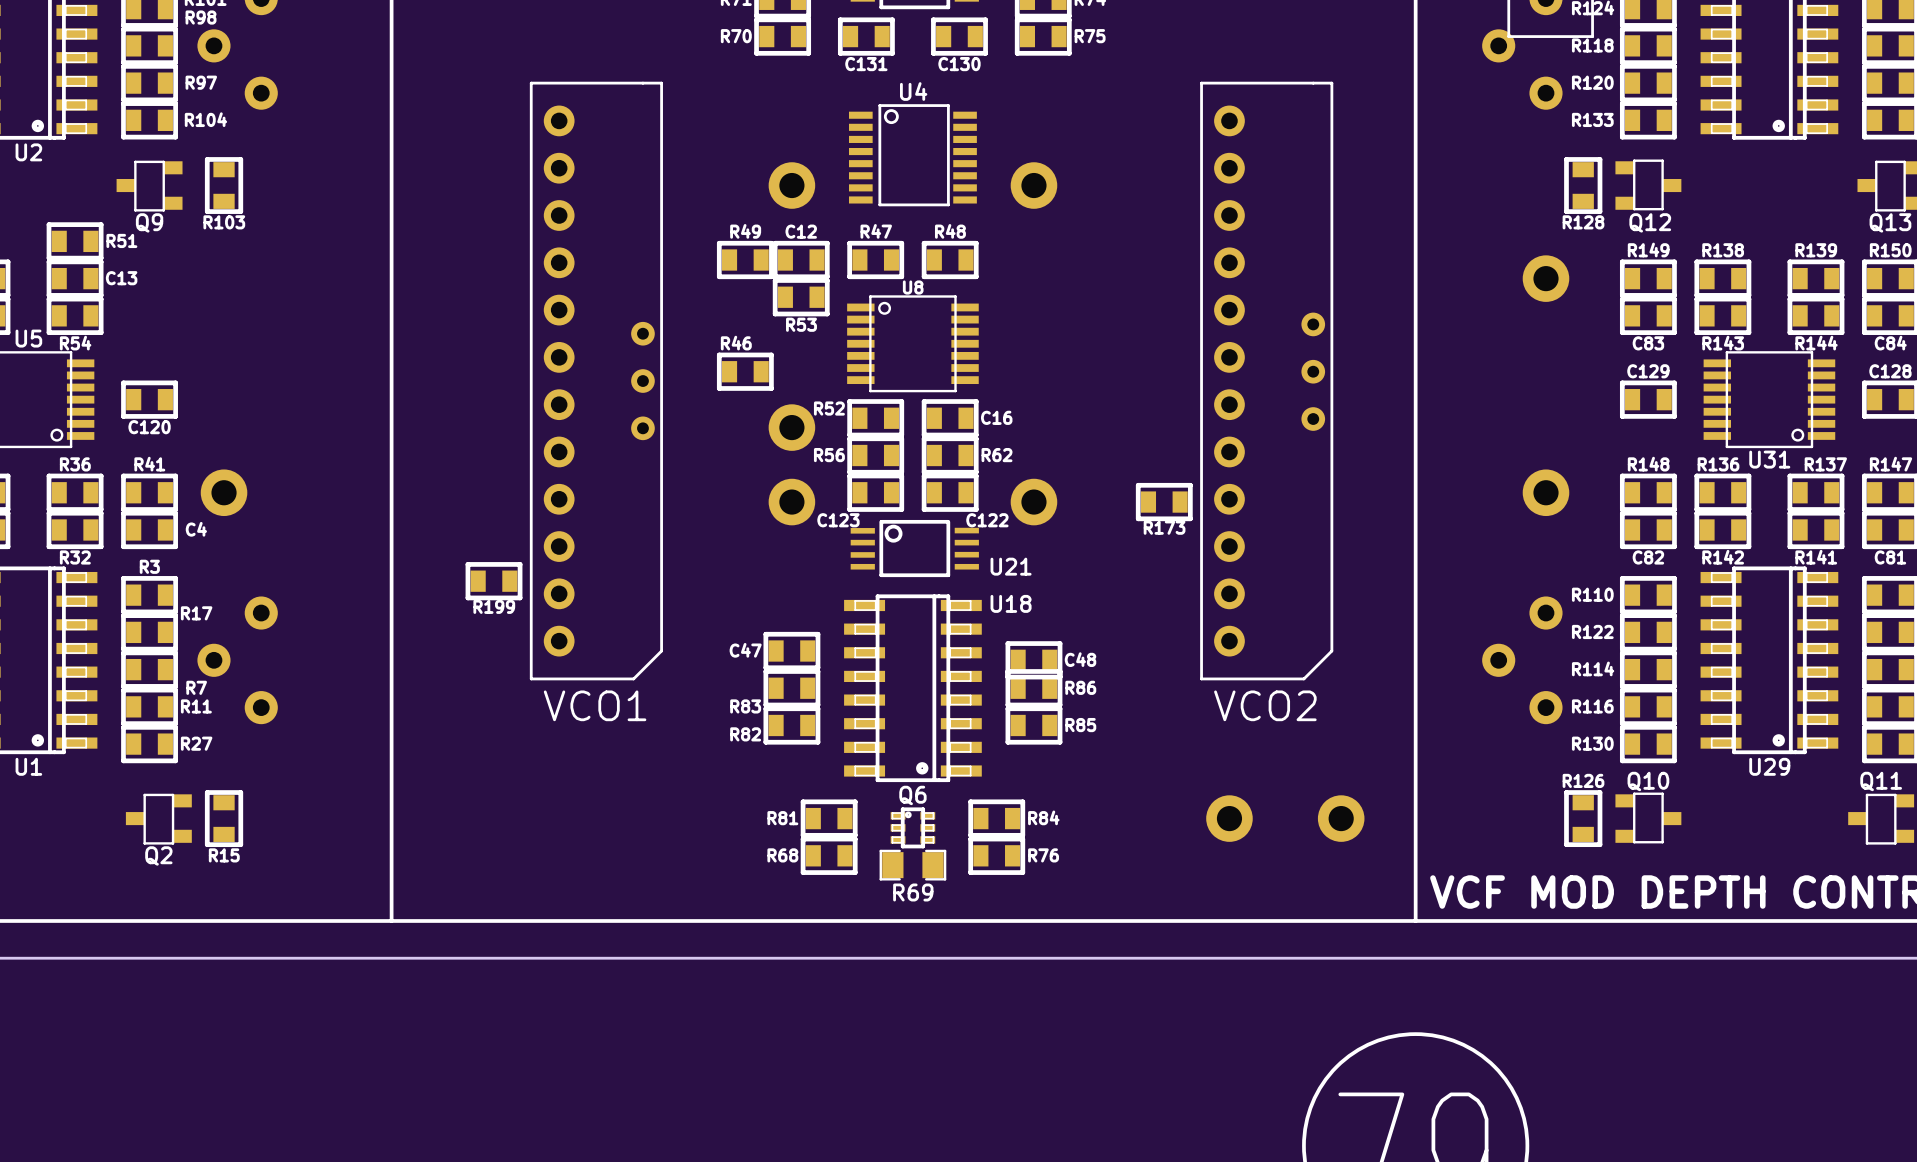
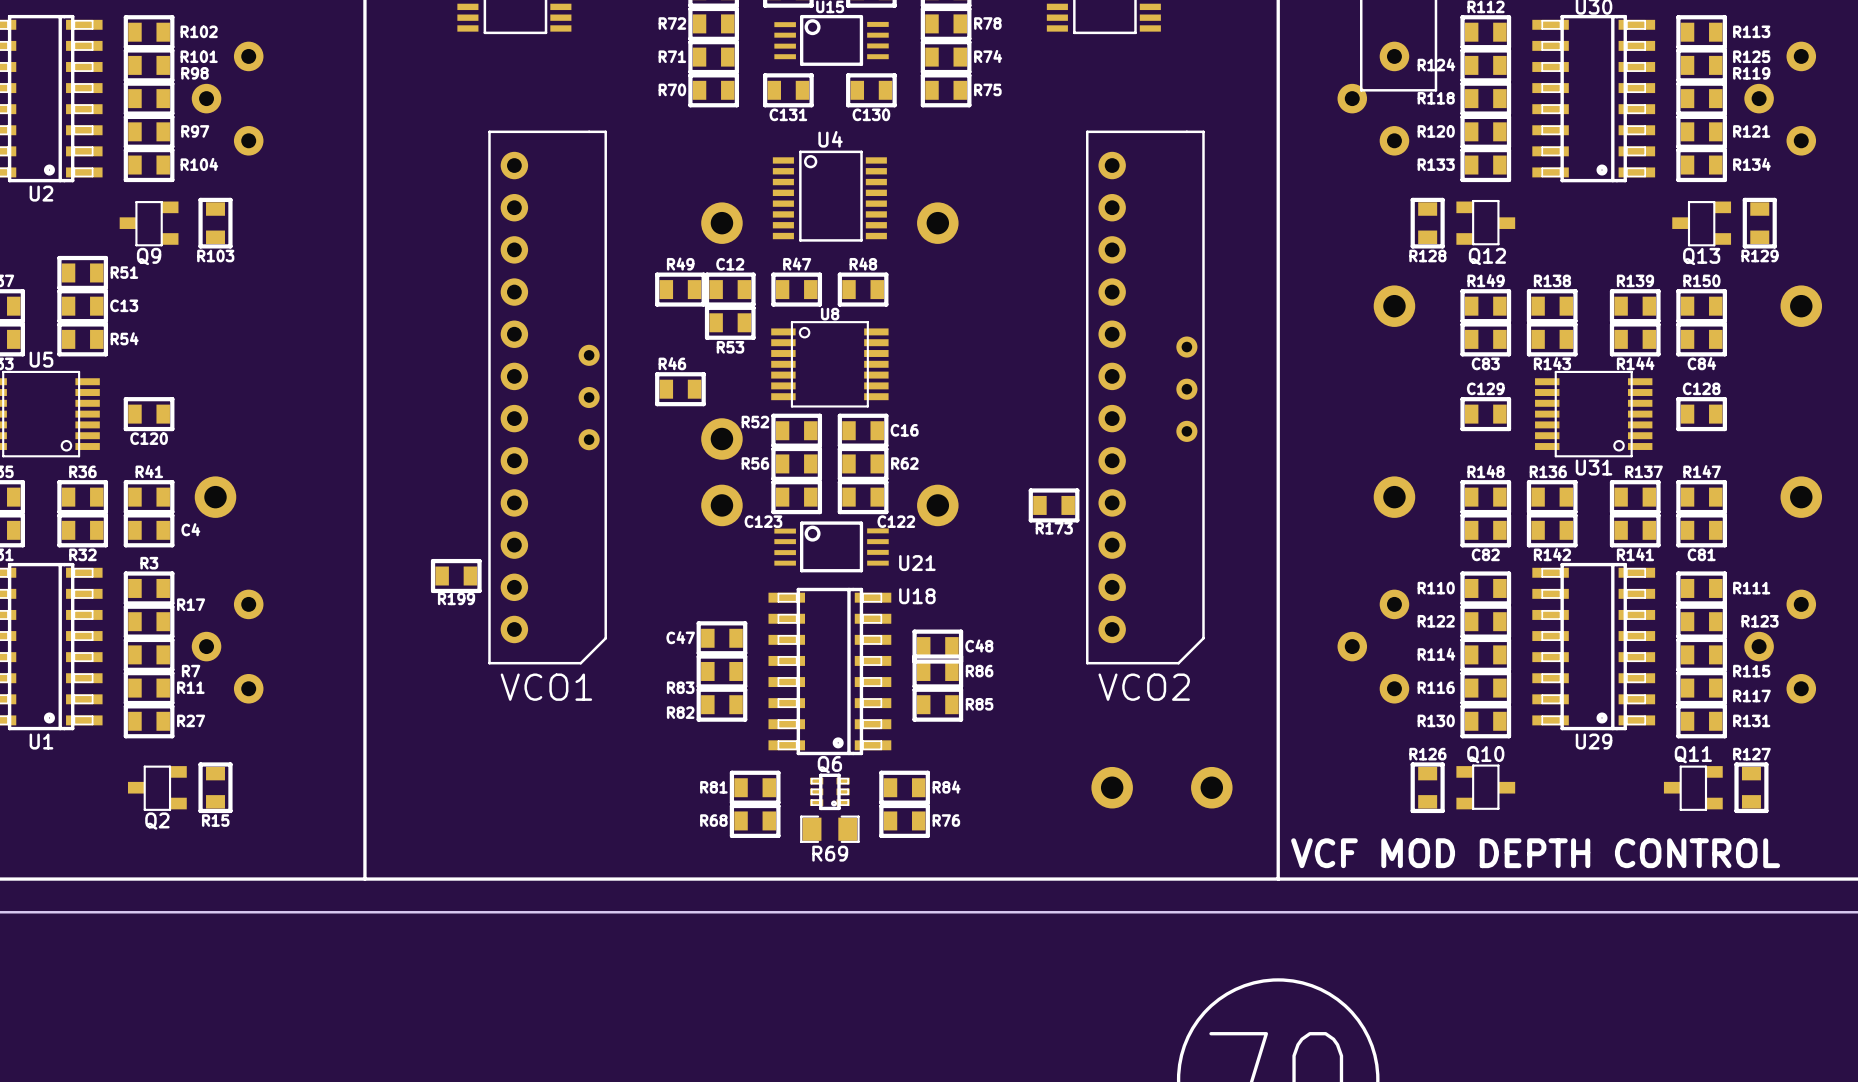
R54 name position: R54 (75, 343) -> R54 (124, 338)
Q6 rotation: 0° (912, 827) -> 180° (829, 791)

